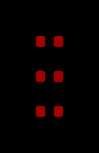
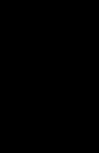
part: (49, 41) -> none
part: (49, 76) -> none
part: (49, 111) -> none

